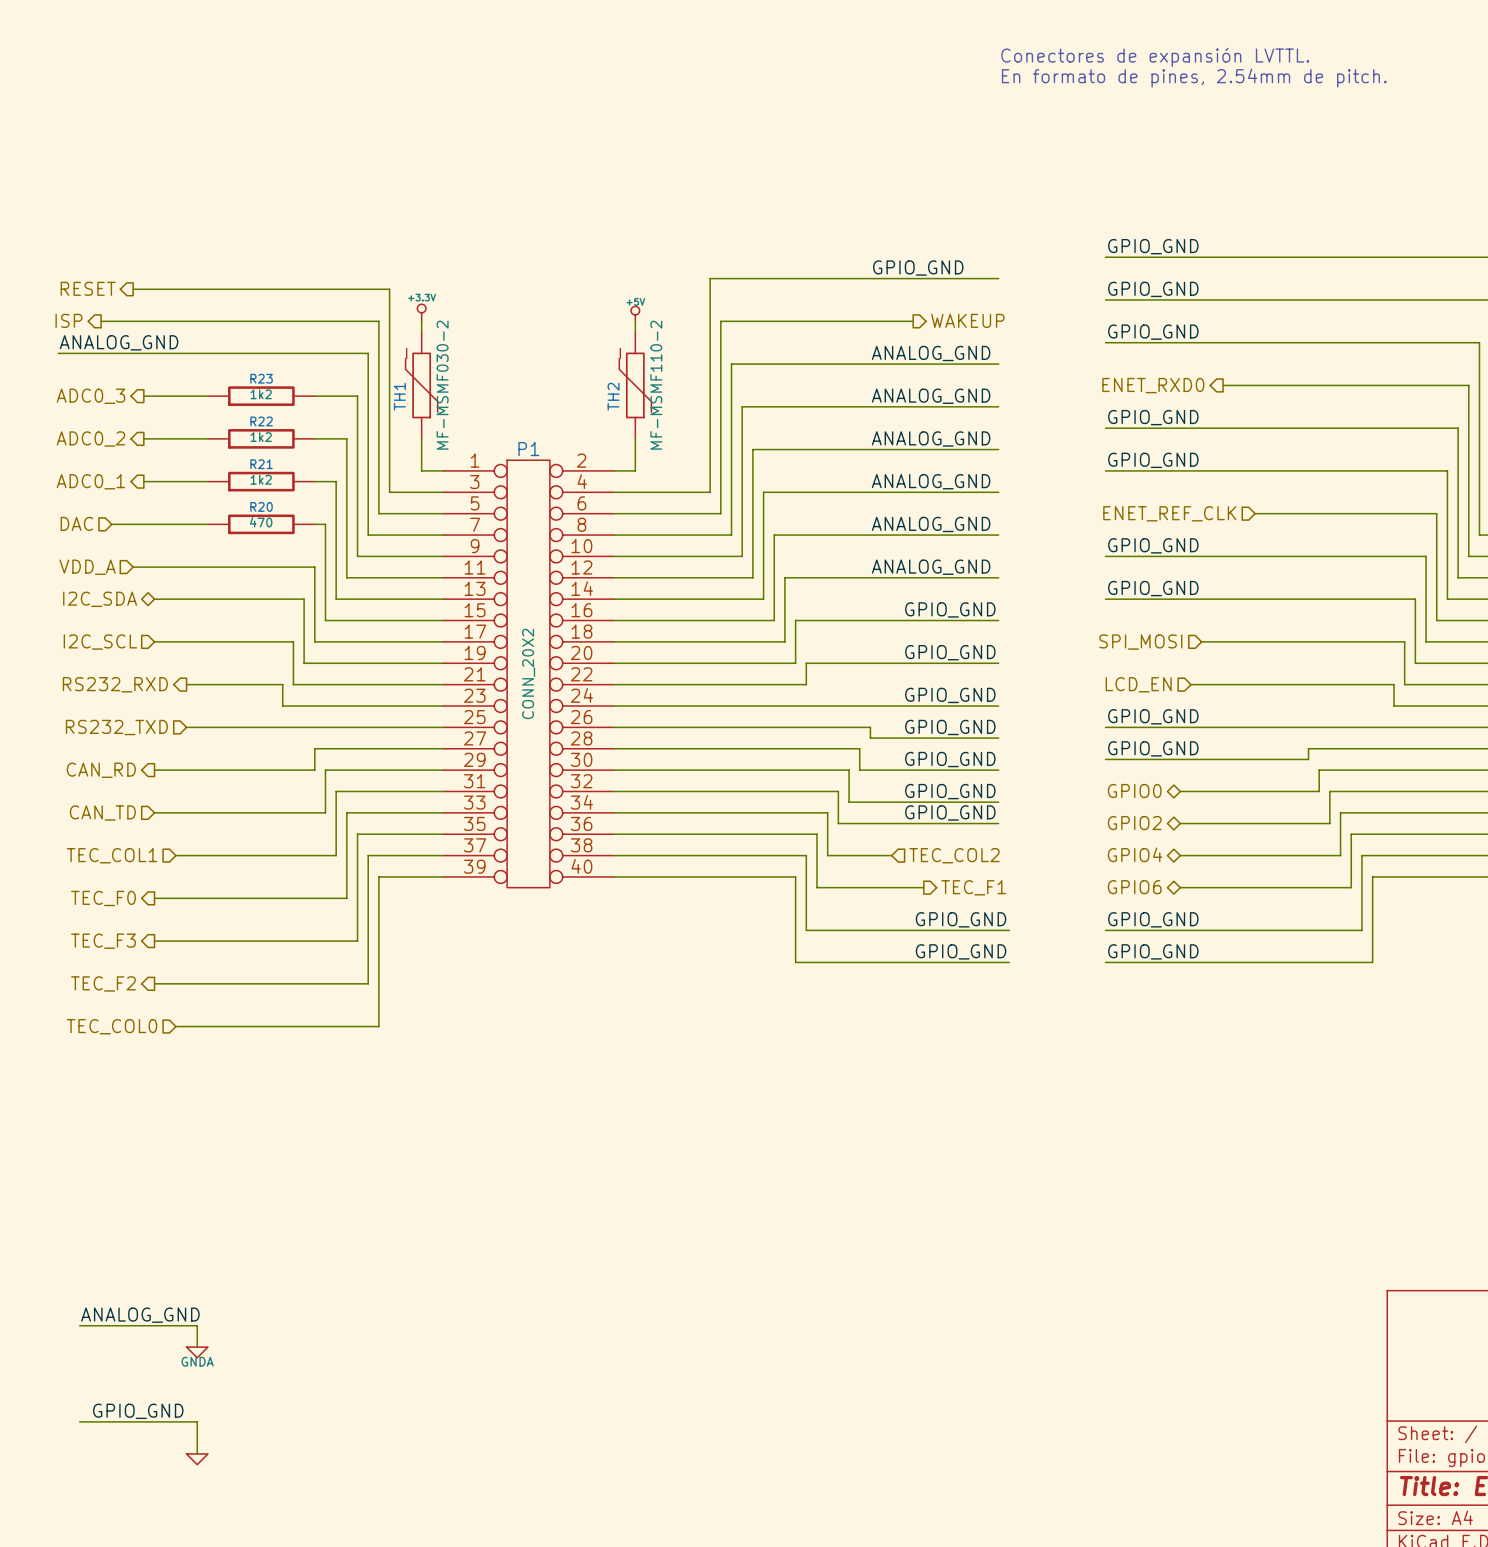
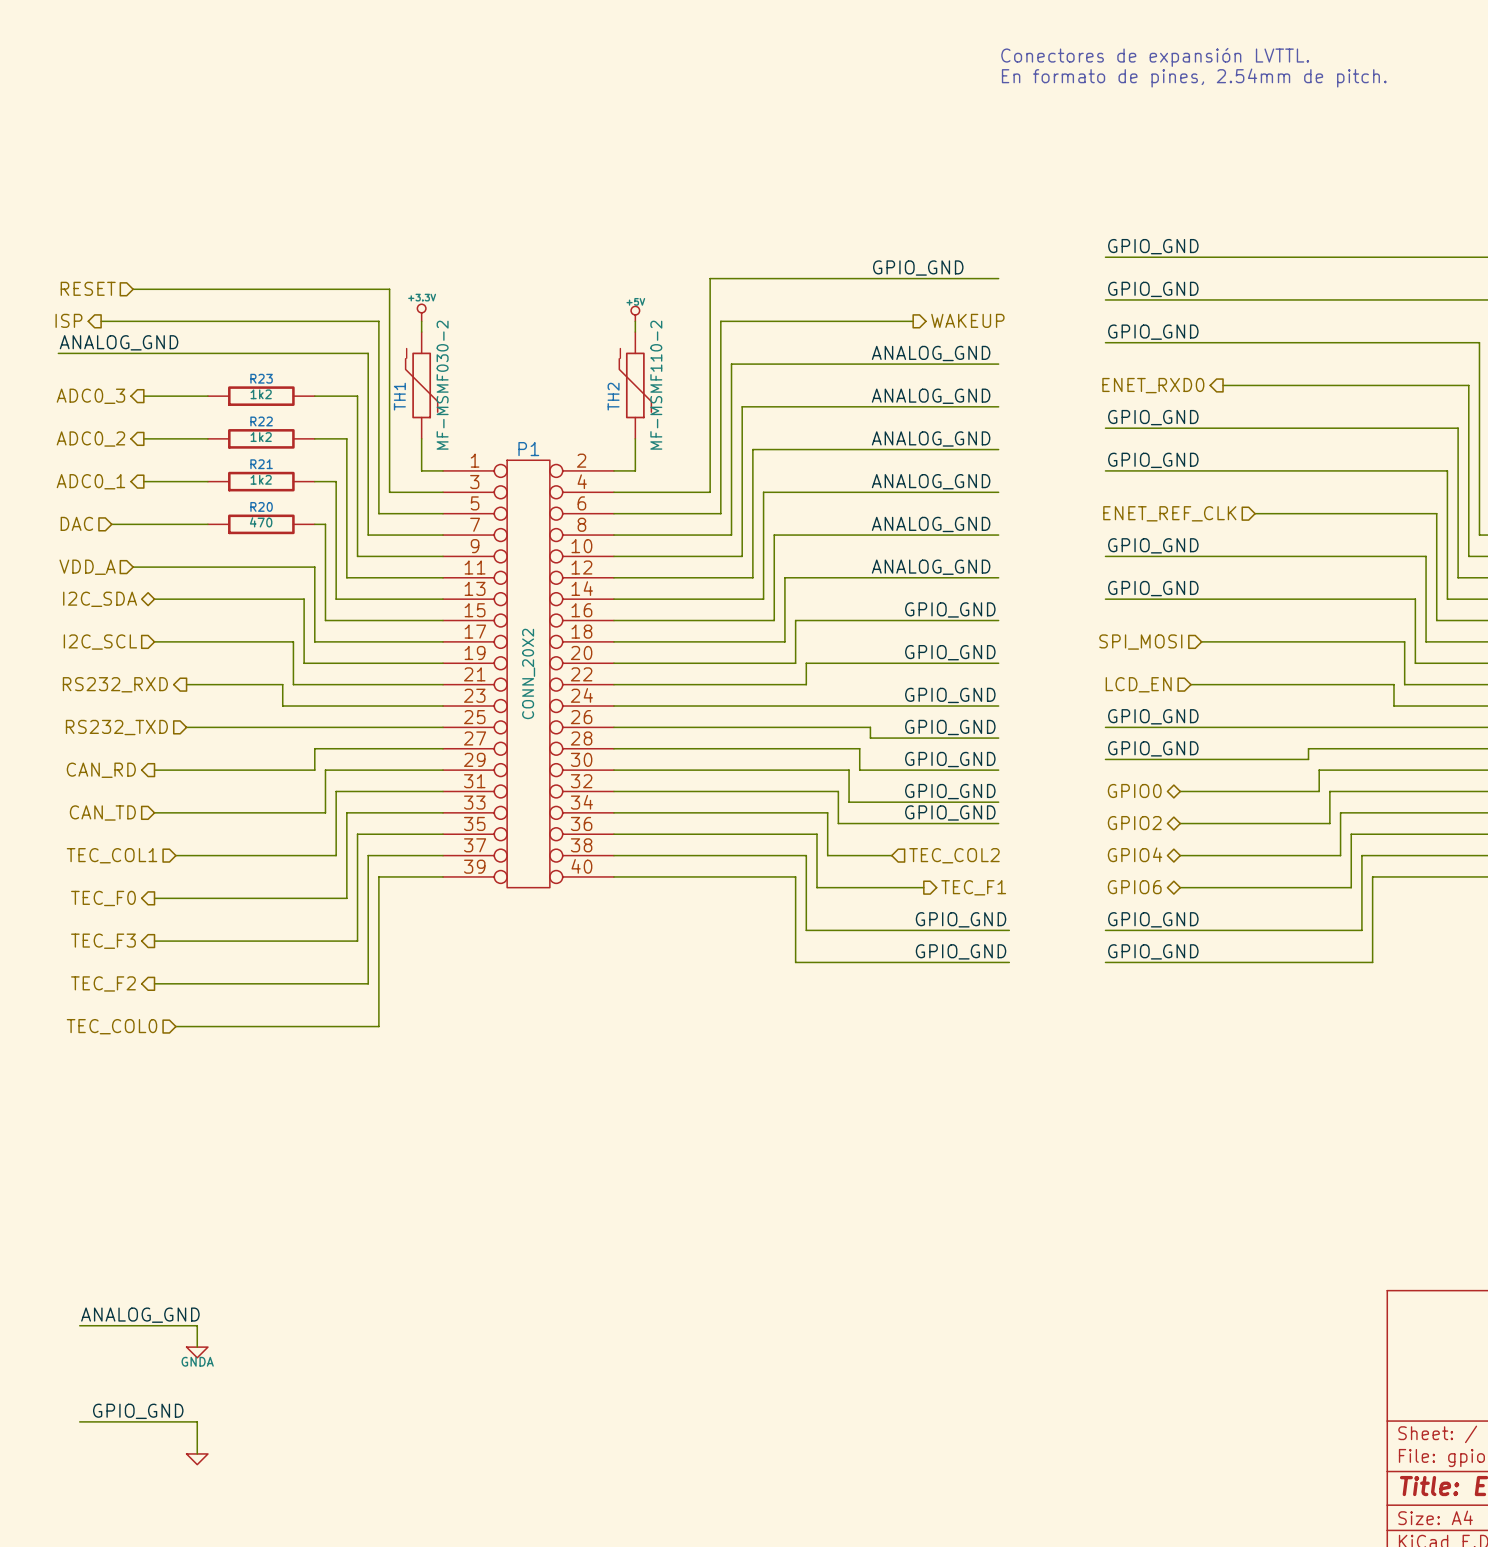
hierarchical label shape: output (88, 288) -> input (88, 288)

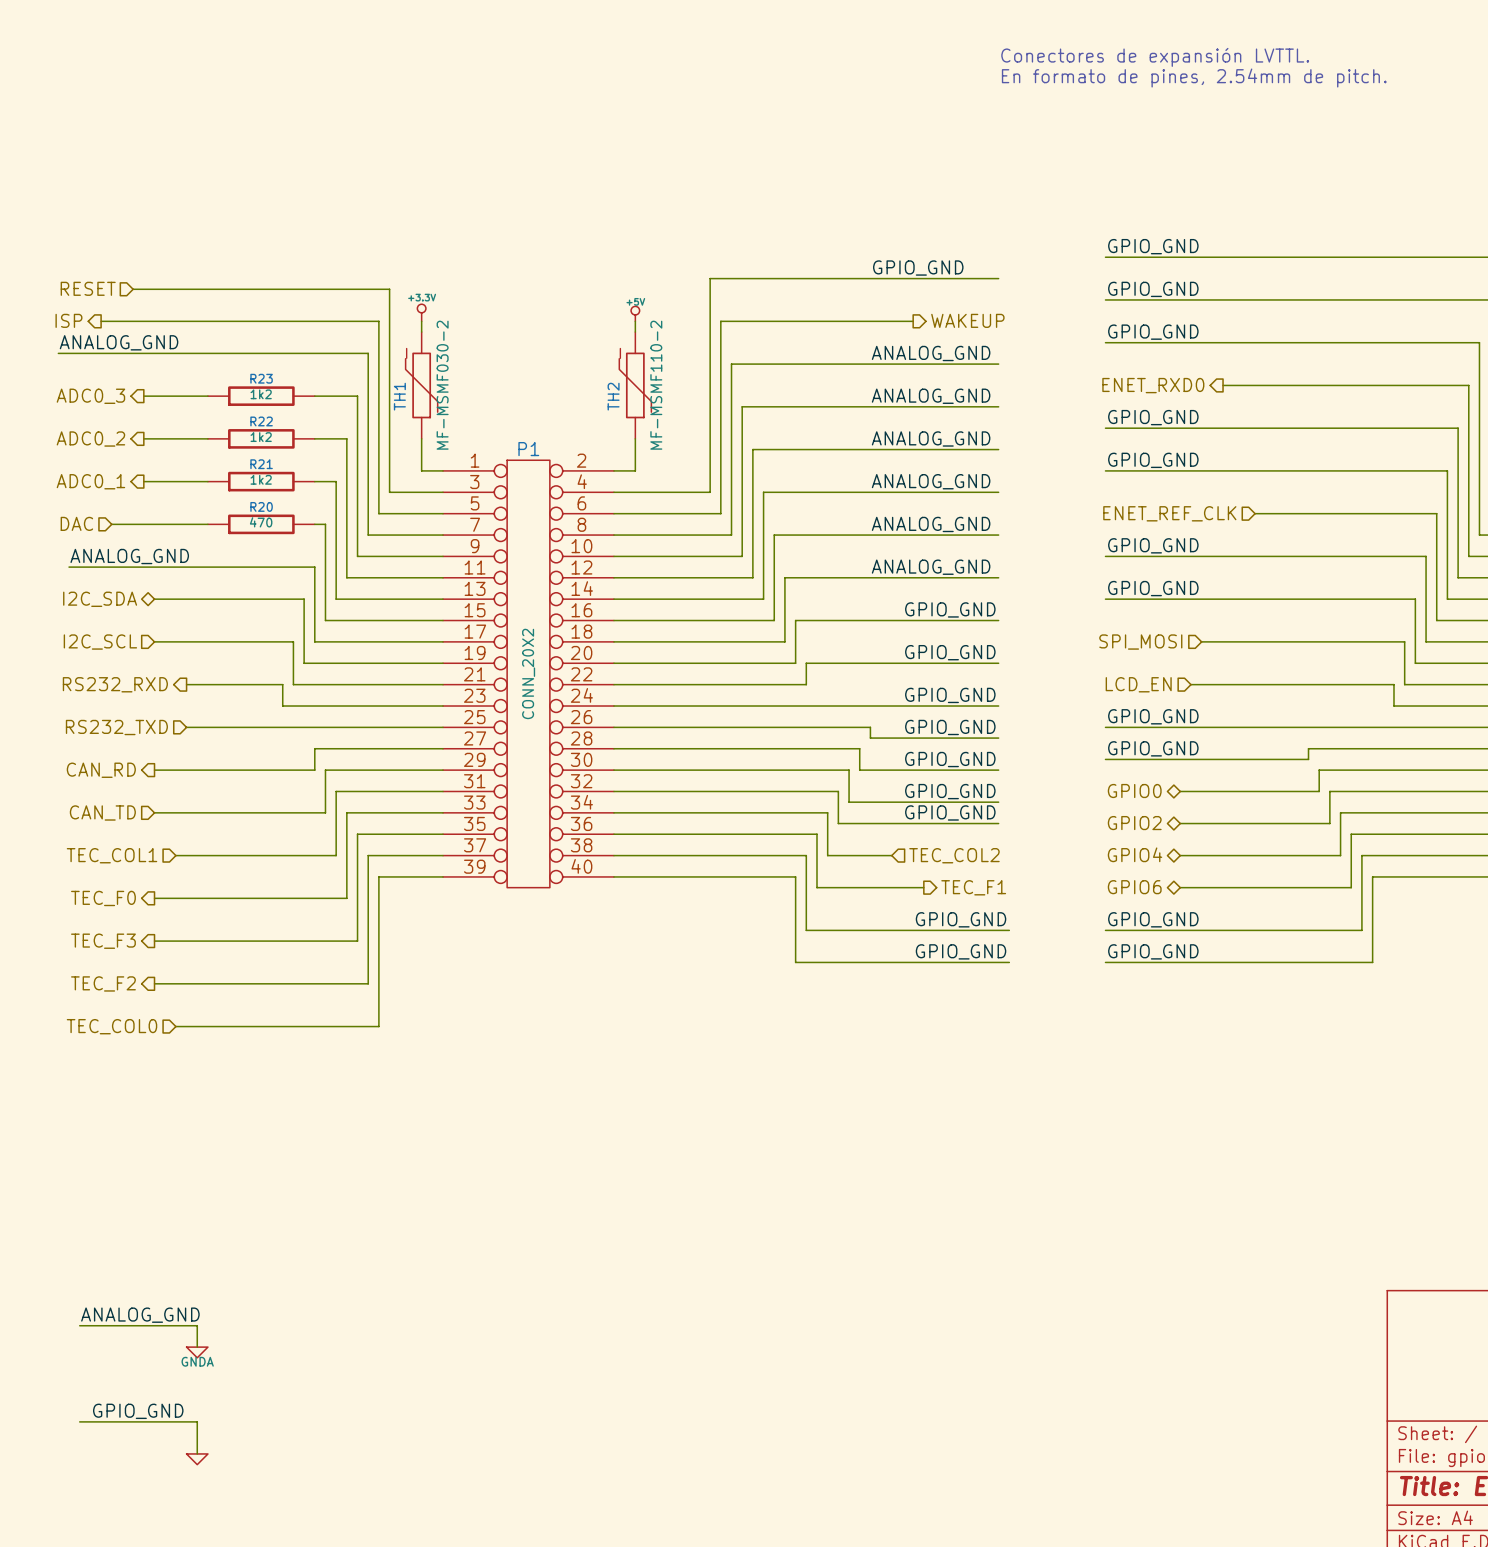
label: none -> ANALOG_GND (129, 556)
wire: none -> (69, 567) (133, 567)
hierarchical label: VDD_A (87, 567) -> none

